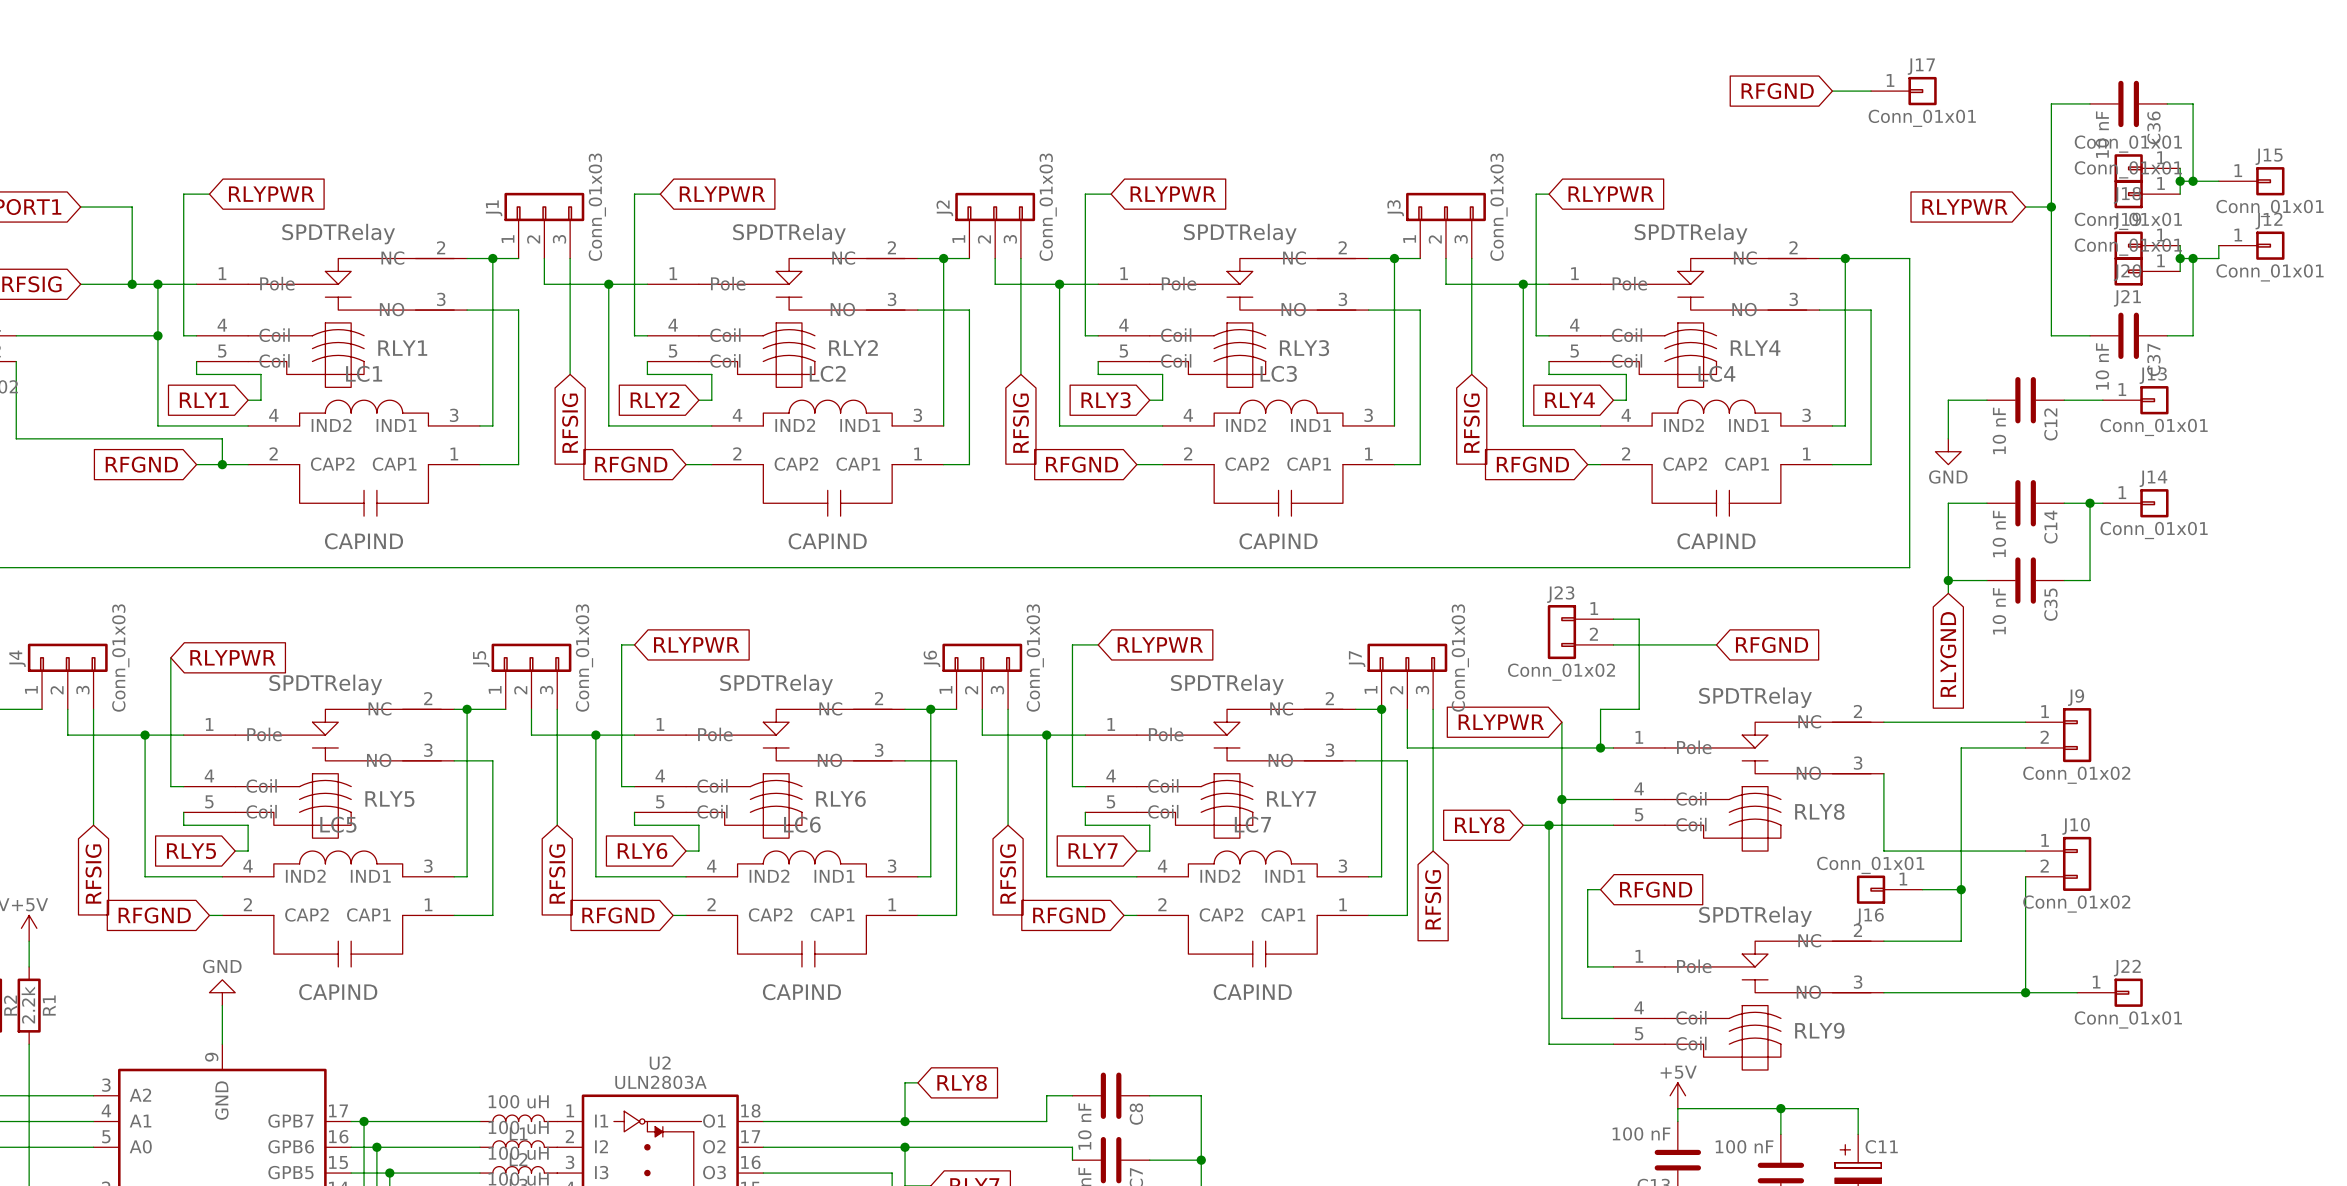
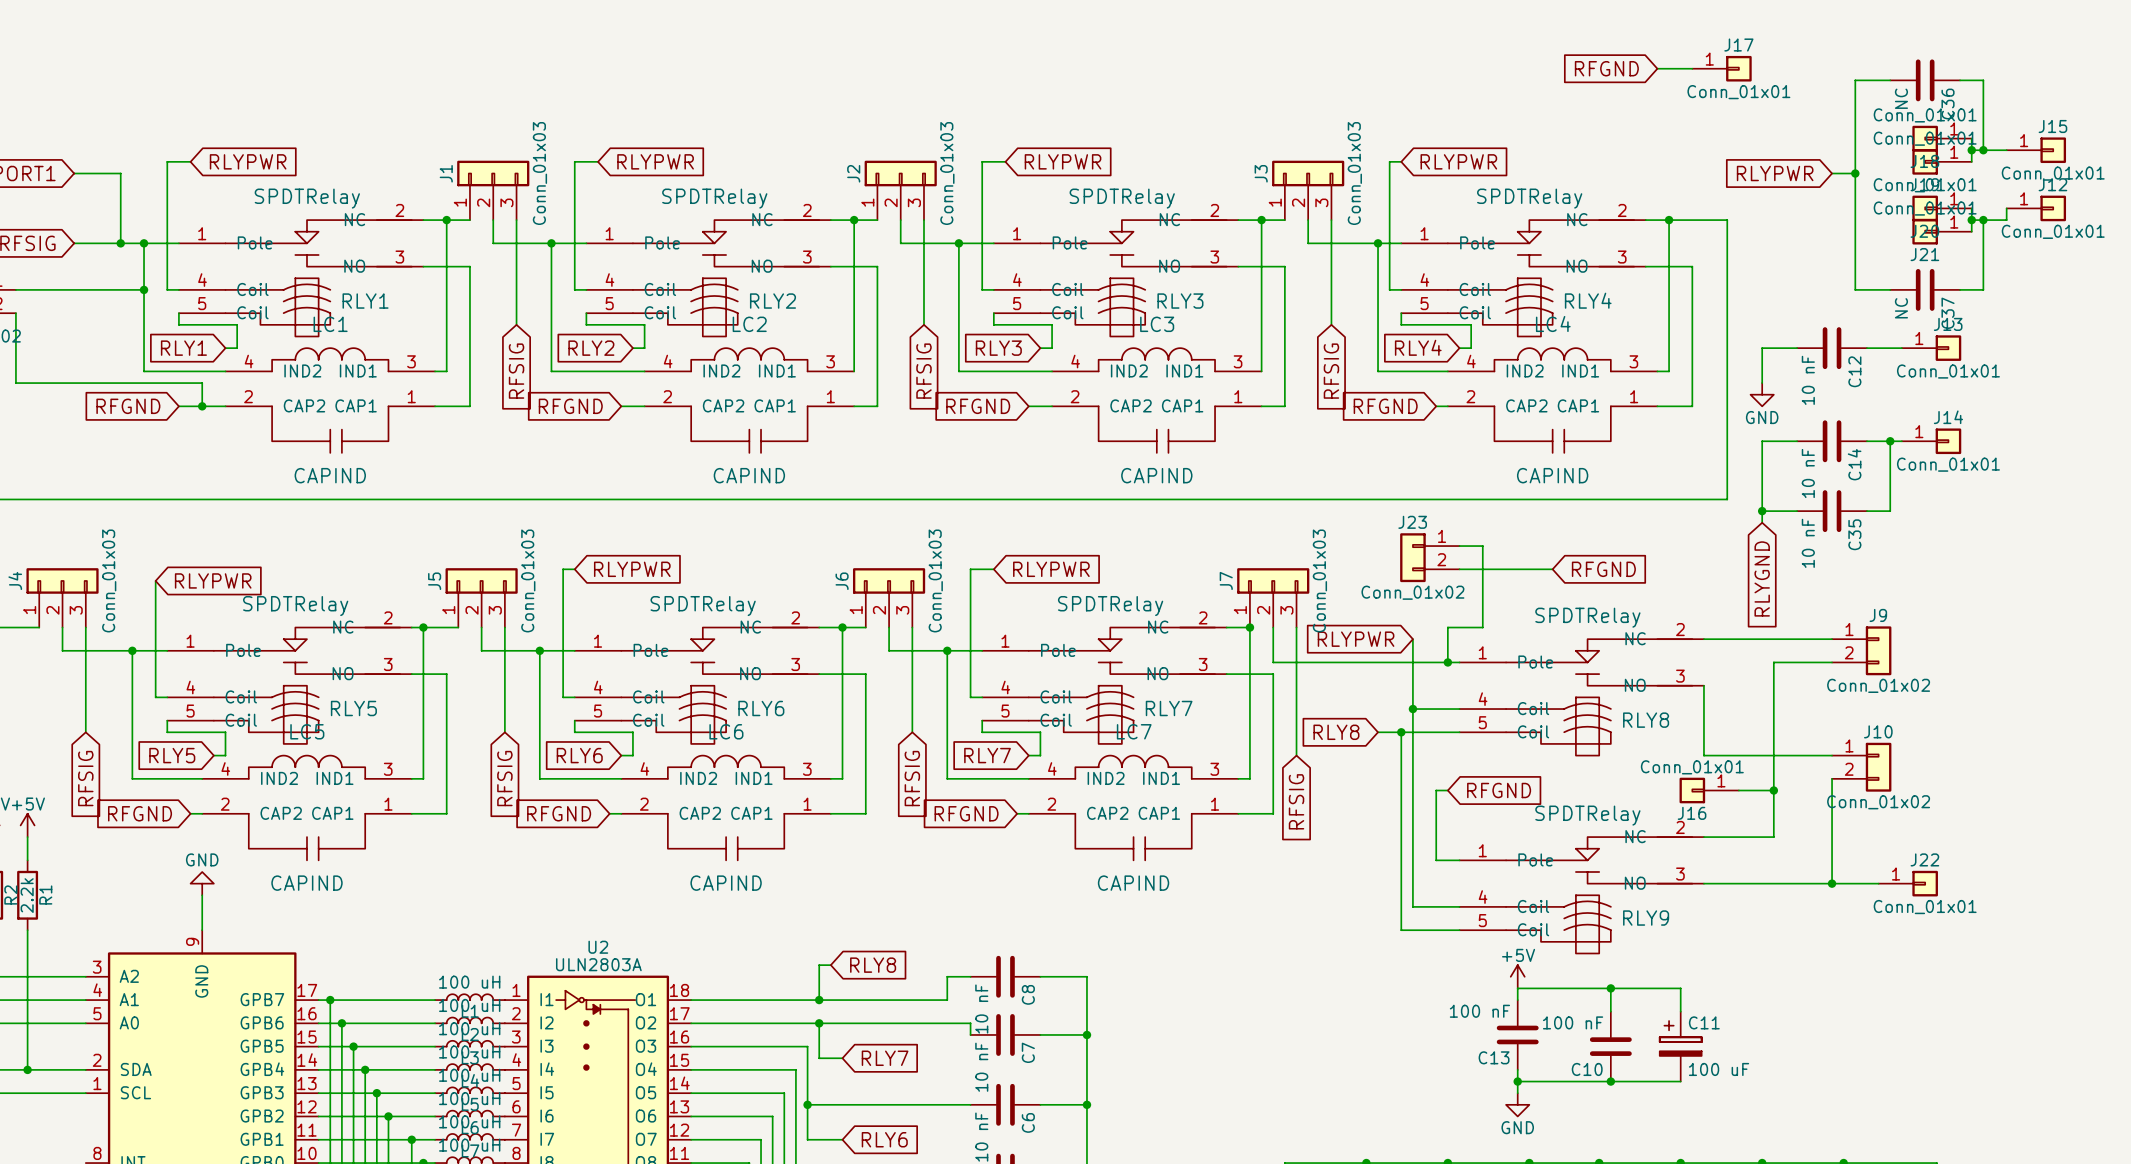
C36 value: 10 nF (2102, 134) -> NC (1901, 98)
C37 value: 10 nF (2102, 366) -> NC (1901, 308)

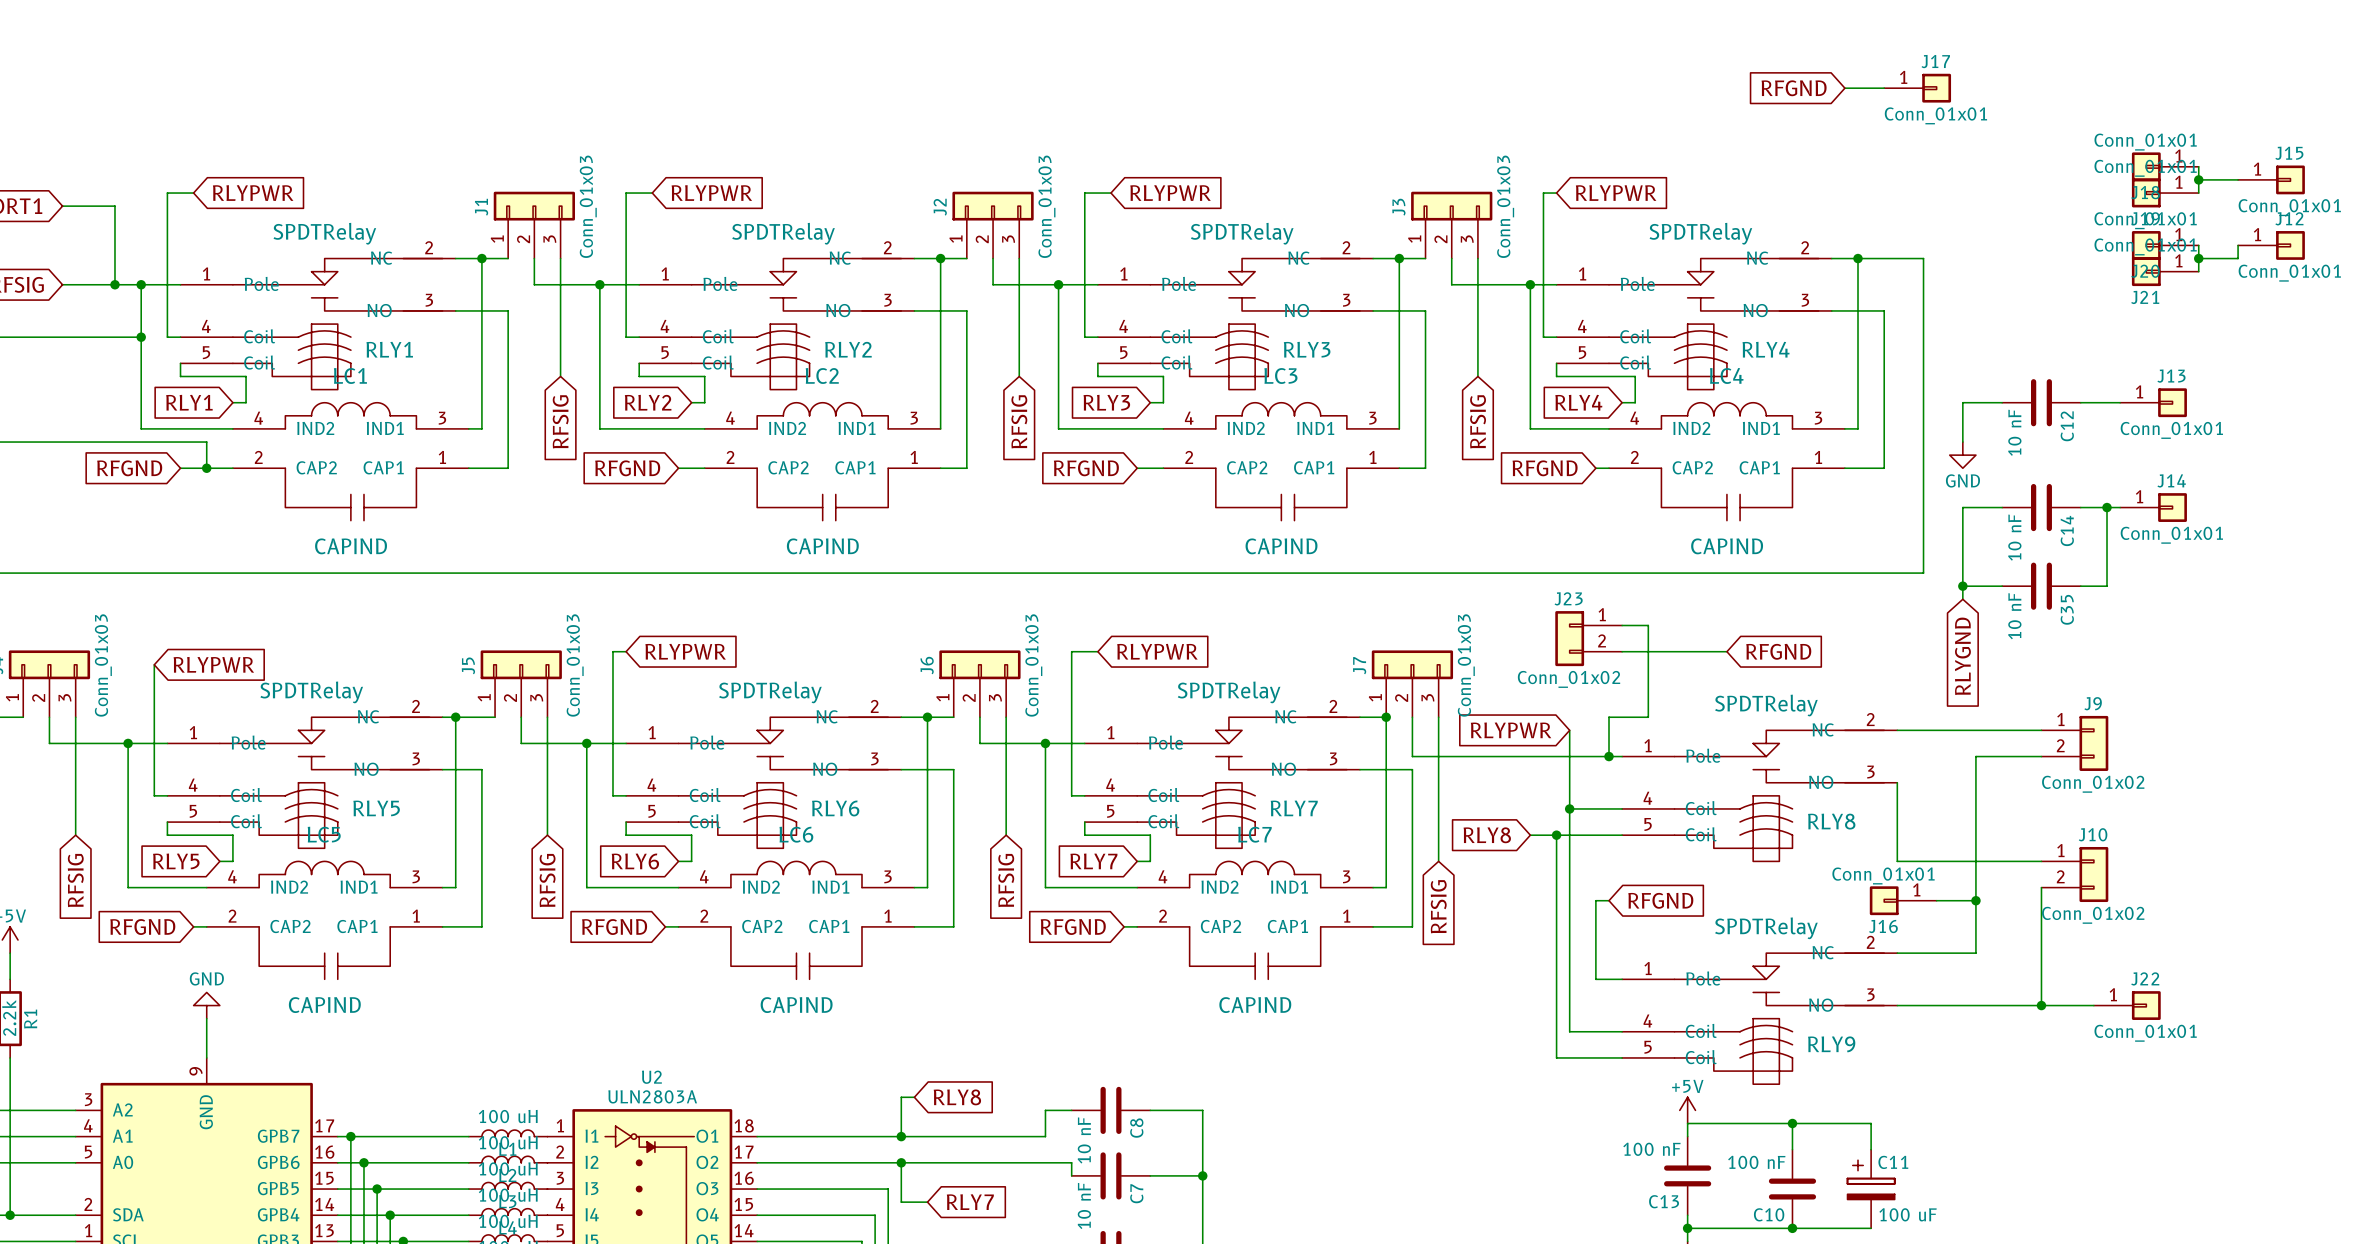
wire: (1890, 80) (1855, 80) (1855, 289) (1890, 289) -> none
C36: NC (1925, 80) -> none
wire: (1960, 80) (1983, 80) (1983, 150) -> none
junction: (1983, 150) -> none
global label: RLYPWR (1775, 173) -> none
wire: (1832, 173) (1855, 173) -> none
junction: (1855, 173) -> none
wire: (1983, 220) (1983, 289) (1960, 289) -> none
junction: (1983, 220) -> none
C37: NC (1925, 289) -> none

